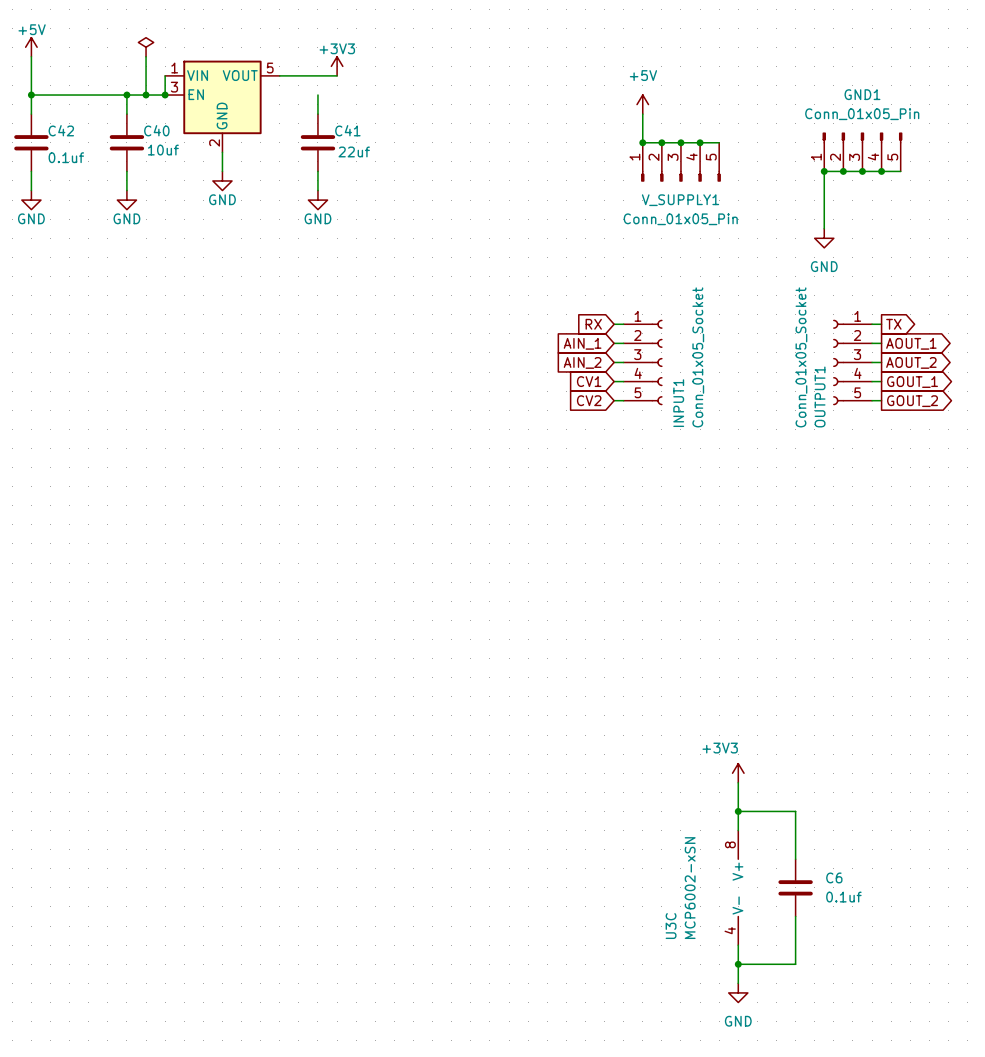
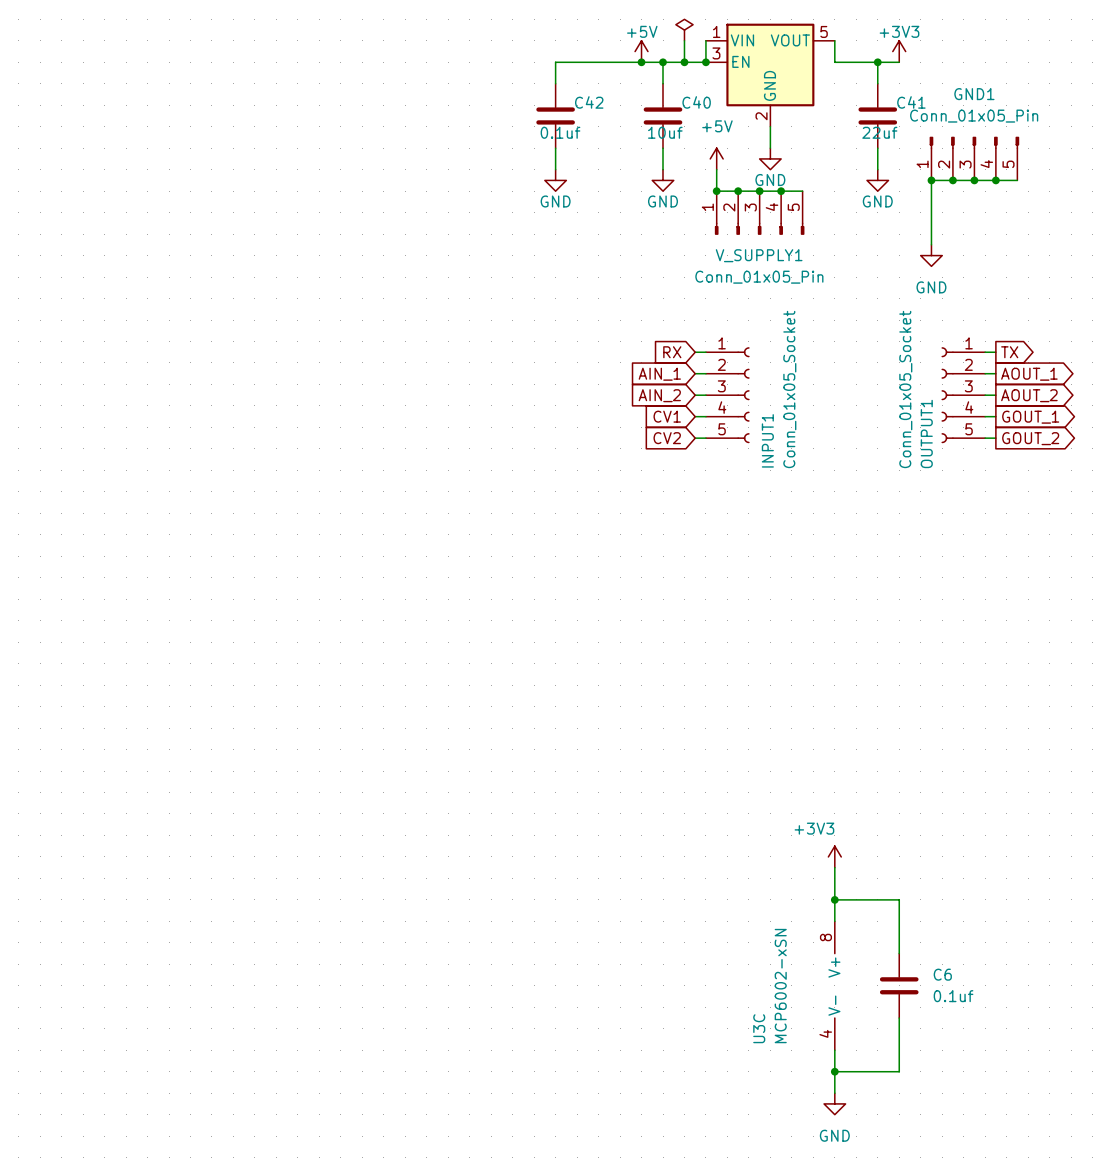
power symbol: none -> (684, 30)
power symbol: +5V (31, 47) -> none
power symbol: (146, 47) -> none
wire: none -> (684, 40) (684, 62)
wire: none -> (705, 40) (705, 62) (555, 62) (555, 83)
wire: none -> (834, 40) (834, 62) (899, 62)
wire: (31, 56) (31, 114) -> none
wire: (146, 56) (146, 95) -> none
power symbol: none -> +5V (641, 51)
power symbol: none -> +3V3 (899, 51)
power symbol: +3V3 (337, 66) -> none
junction: none -> (641, 62)
wire: none -> (663, 62) (663, 83)
junction: none -> (663, 62)
junction: none -> (684, 62)
junction: none -> (705, 62)
wire: none -> (877, 62) (877, 83)
junction: none -> (877, 62)
wire: (165, 75) (165, 95) (31, 95) -> none
wire: (279, 75) (337, 75) -> none
part: none -> (770, 75)
junction: (31, 95) -> none
wire: (126, 95) (126, 114) -> none
junction: (126, 95) -> none
junction: (146, 95) -> none
junction: (165, 95) -> none
wire: (317, 95) (317, 114) -> none
power symbol: +5V (642, 104) -> none
part: (222, 106) -> none
wire: (642, 114) (642, 142) (719, 142) -> none
wire: none -> (770, 126) (770, 148)
C42 position: (31, 142) -> (555, 115)
C40 position: (126, 142) -> (663, 115)
C41 position: (317, 142) -> (877, 115)
wire: none -> (663, 148) (663, 169)
junction: (642, 142) -> none
junction: (661, 142) -> none
junction: (680, 142) -> none
junction: (700, 142) -> none
wire: none -> (877, 148) (877, 169)
C40 value position: 10uf (163, 150) -> 10uf (665, 132)
C41 value position: 22uf (354, 151) -> 22uf (879, 132)
wire: (222, 152) (222, 171) -> none
power symbol: none -> +5V (716, 158)
power symbol: none -> GND (770, 158)
C42 value position: 0.1uf (66, 157) -> 0.1uf (560, 132)
wire: none -> (716, 169) (716, 191) (802, 191)
V_SUPPLY1 position: (680, 162) -> (759, 212)
wire: (31, 171) (31, 190) -> none
wire: (126, 171) (126, 190) -> none
wire: (317, 171) (317, 190) -> (555, 148) (555, 169)
power symbol: none -> GND (555, 180)
power symbol: none -> GND (663, 180)
power symbol: none -> GND (877, 180)
power symbol: GND (222, 180) -> none
junction: none -> (716, 191)
junction: none -> (738, 191)
junction: none -> (759, 191)
junction: none -> (781, 191)
power symbol: GND (31, 200) -> none
power symbol: GND (126, 200) -> none
power symbol: GND (317, 200) -> none

